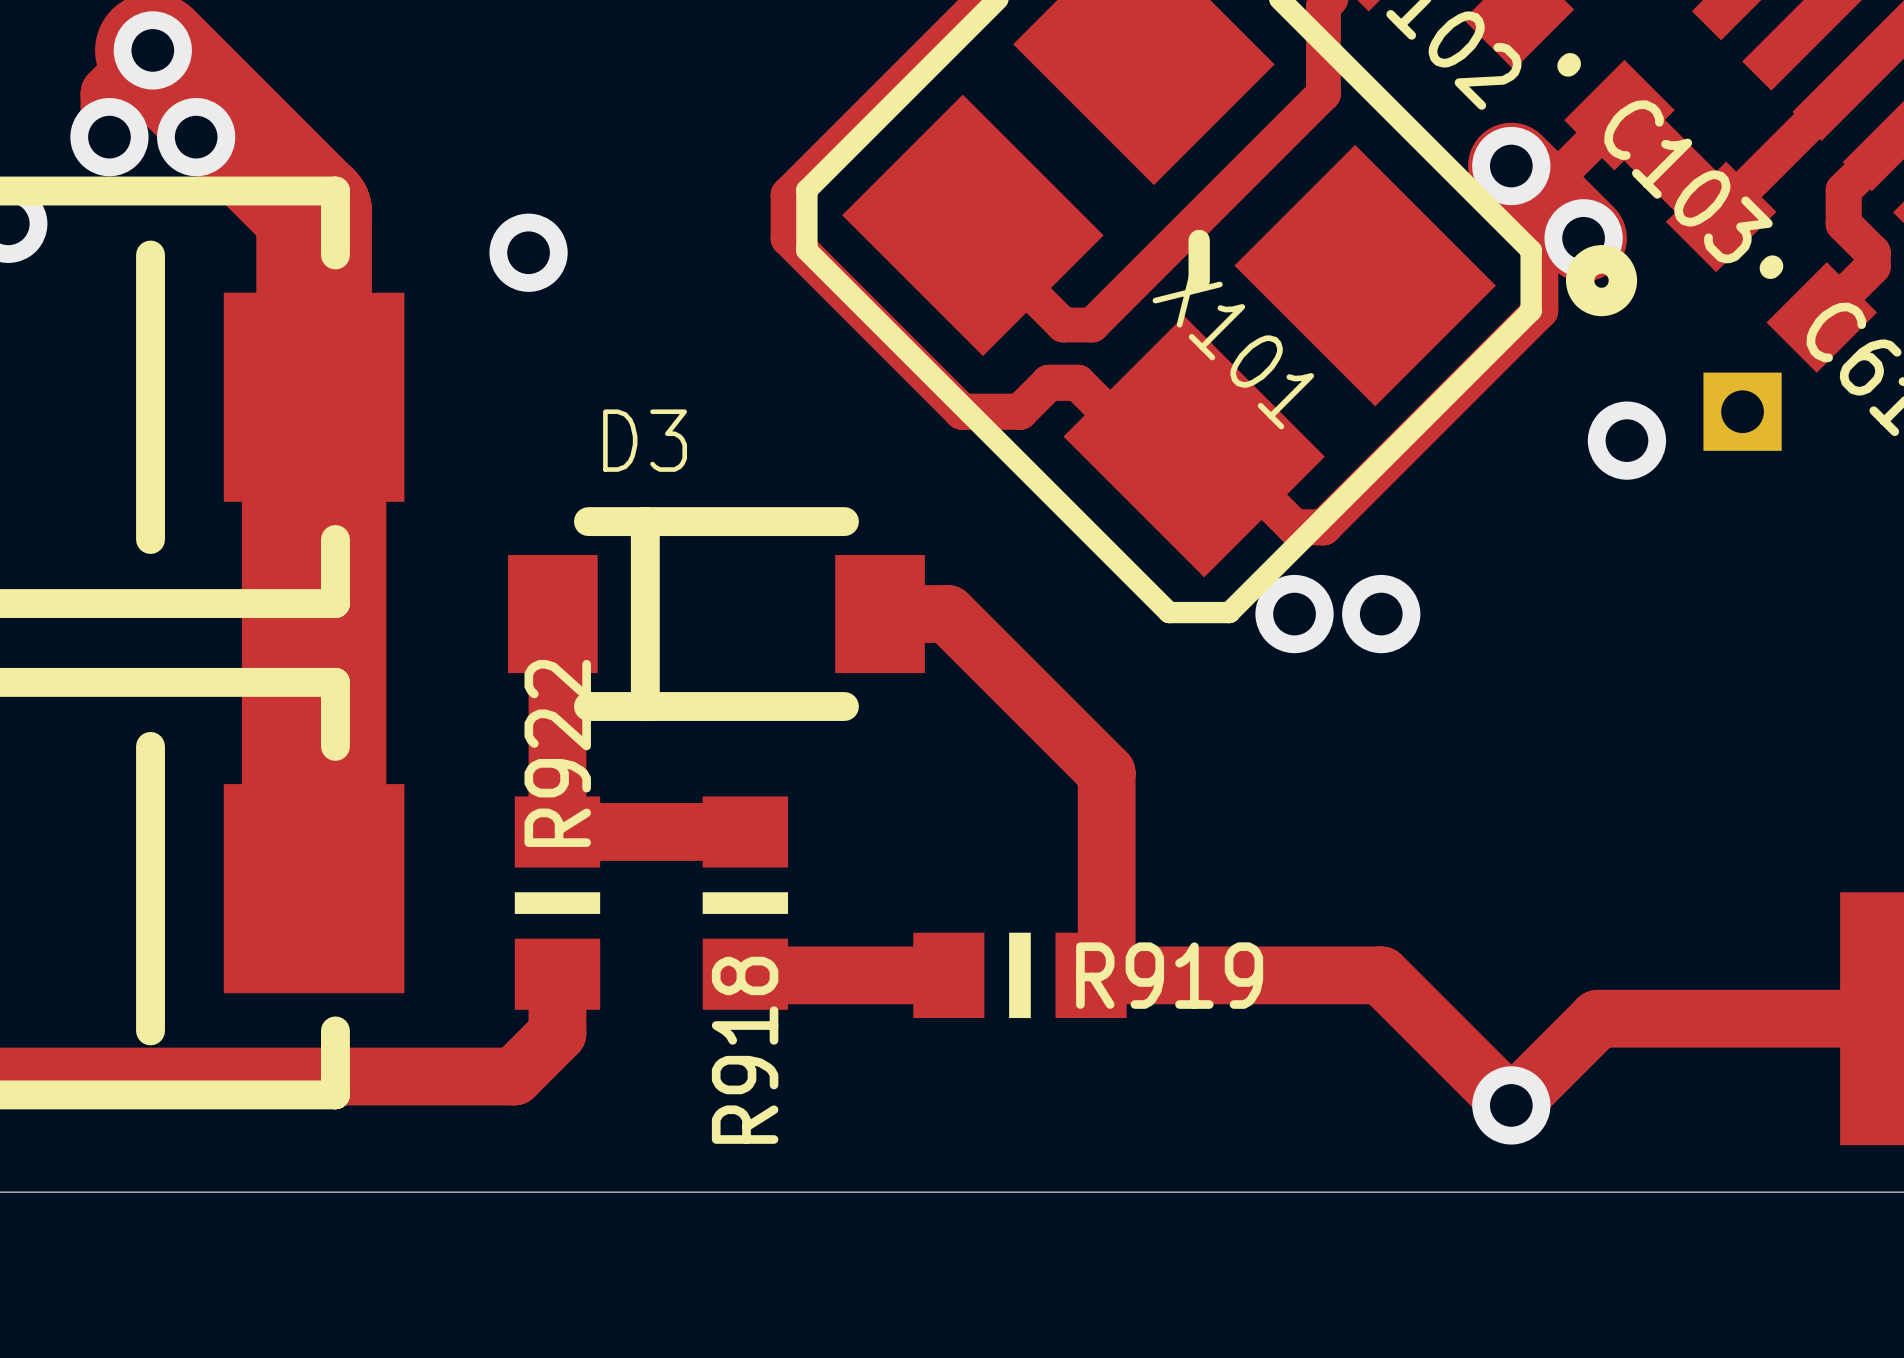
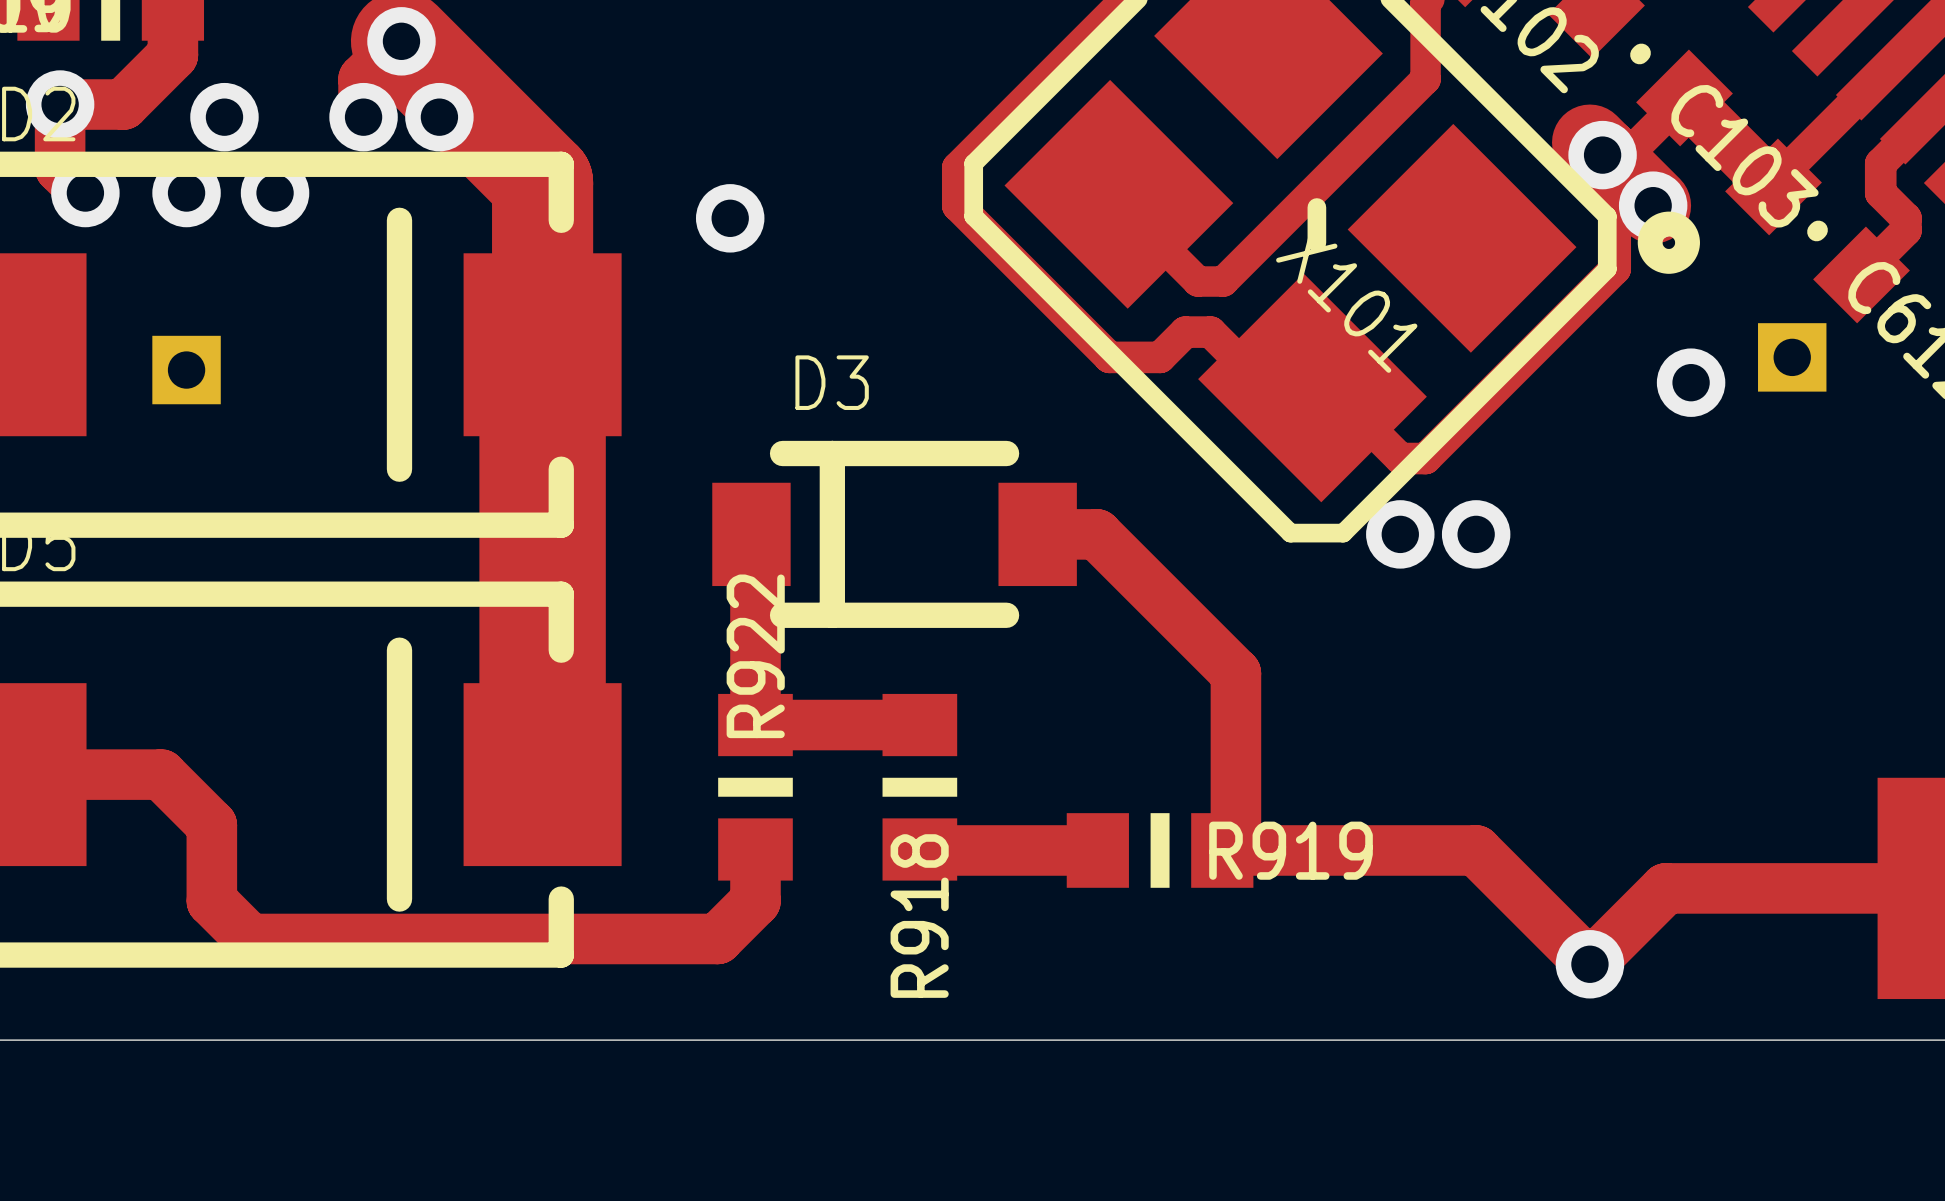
via position: (1511, 166) -> (1602, 155)

